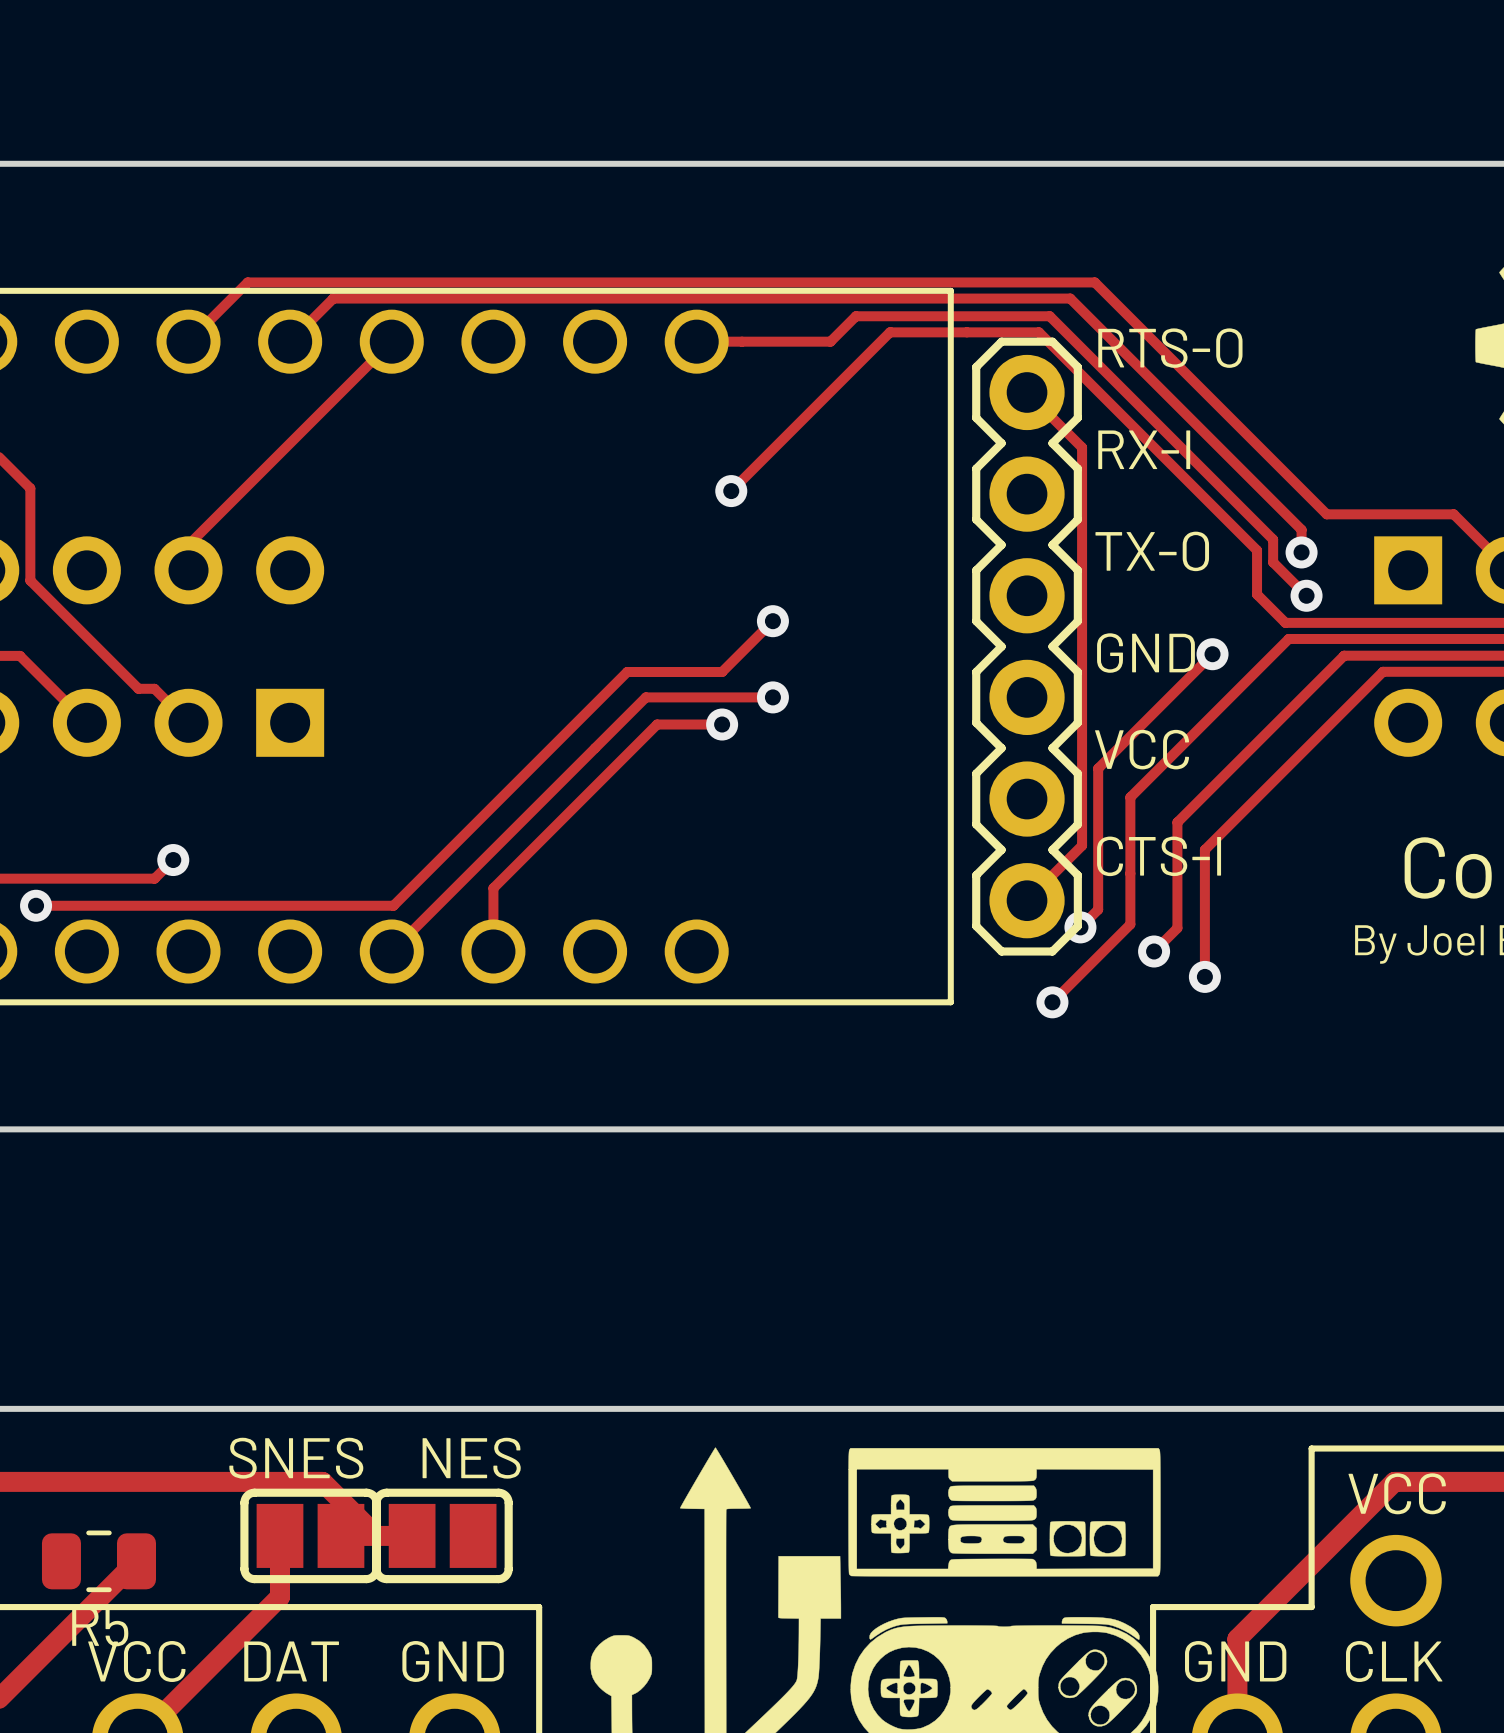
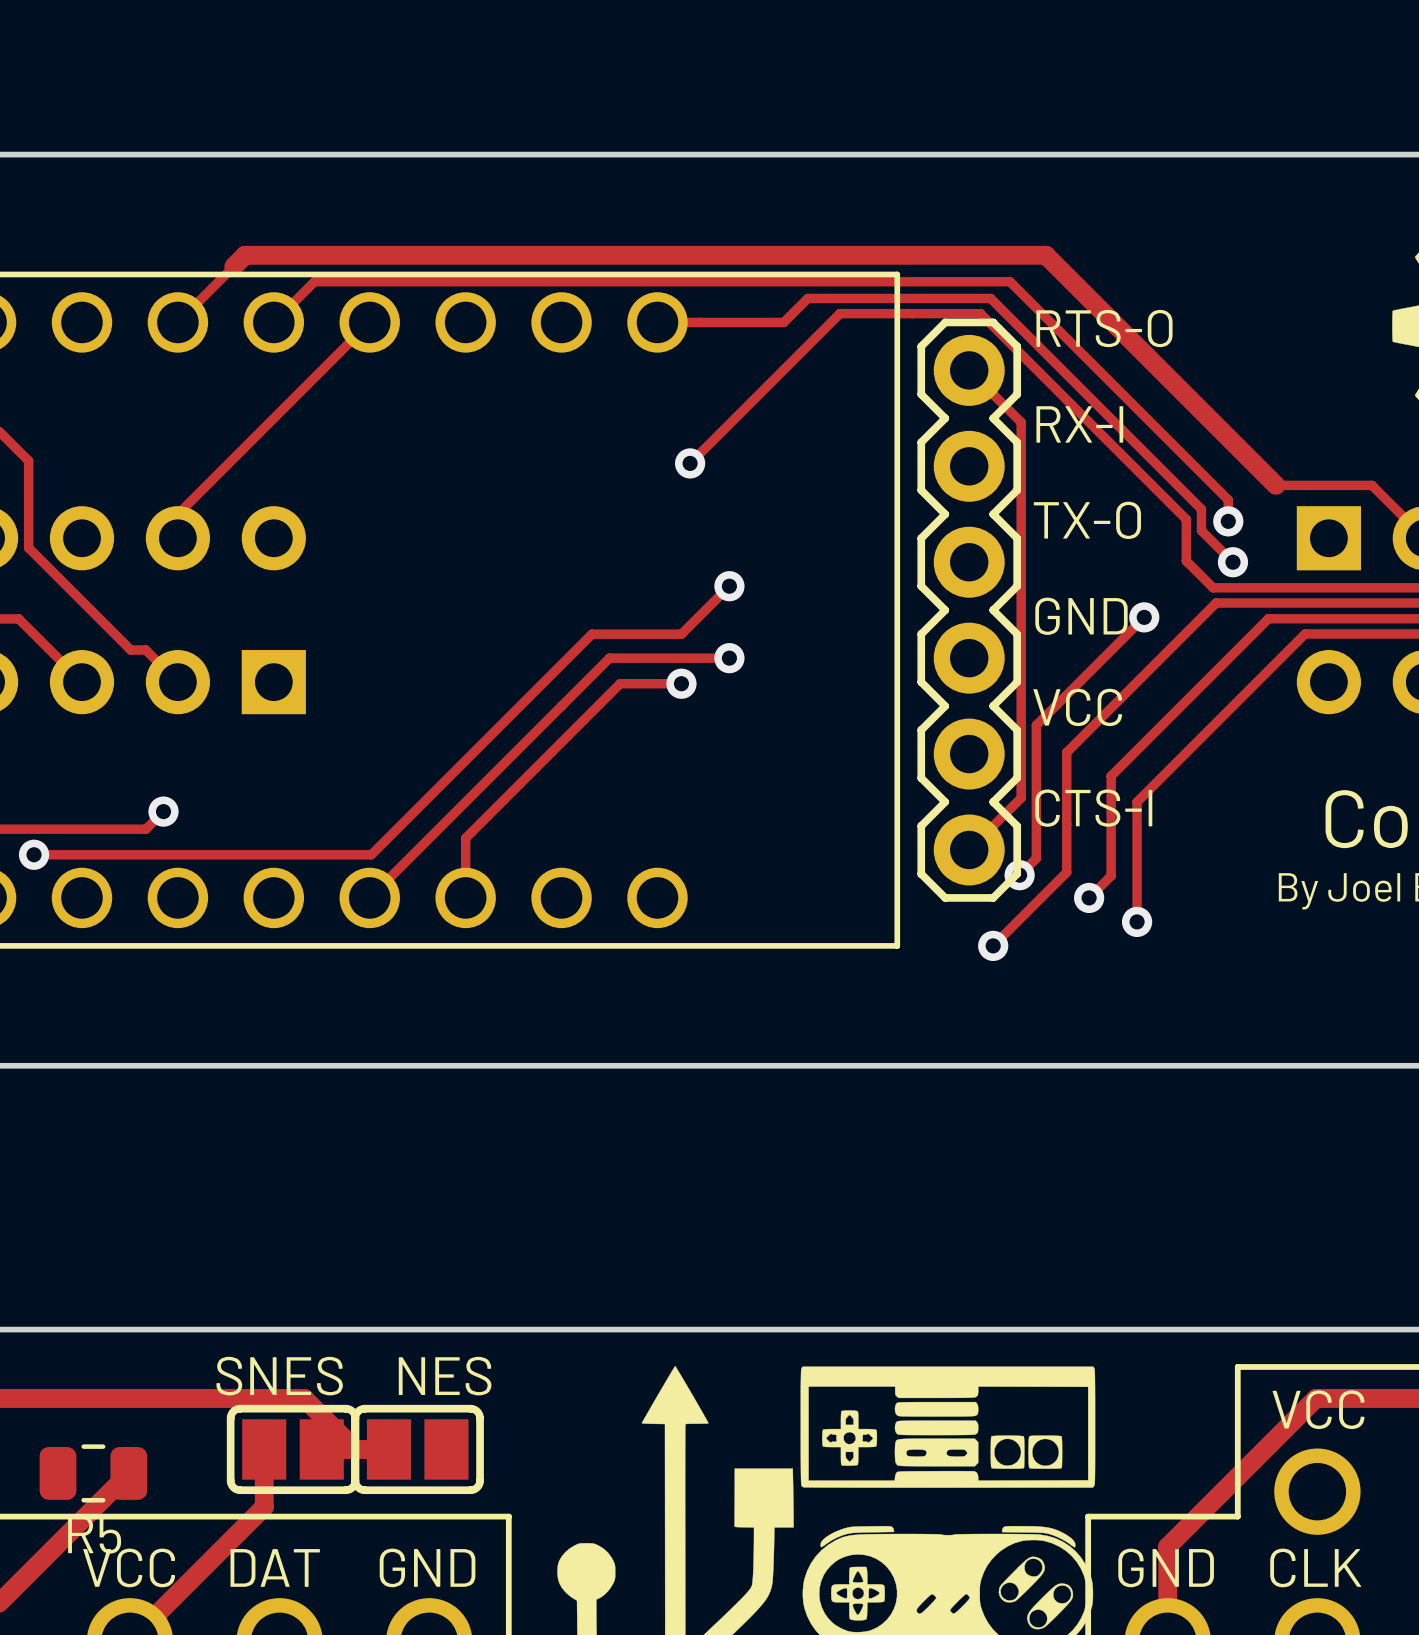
track: (247, 282) (1094, 282) (1326, 514) (1352, 514) -> (233, 266) (245, 255) (1045, 255) (1276, 485)

